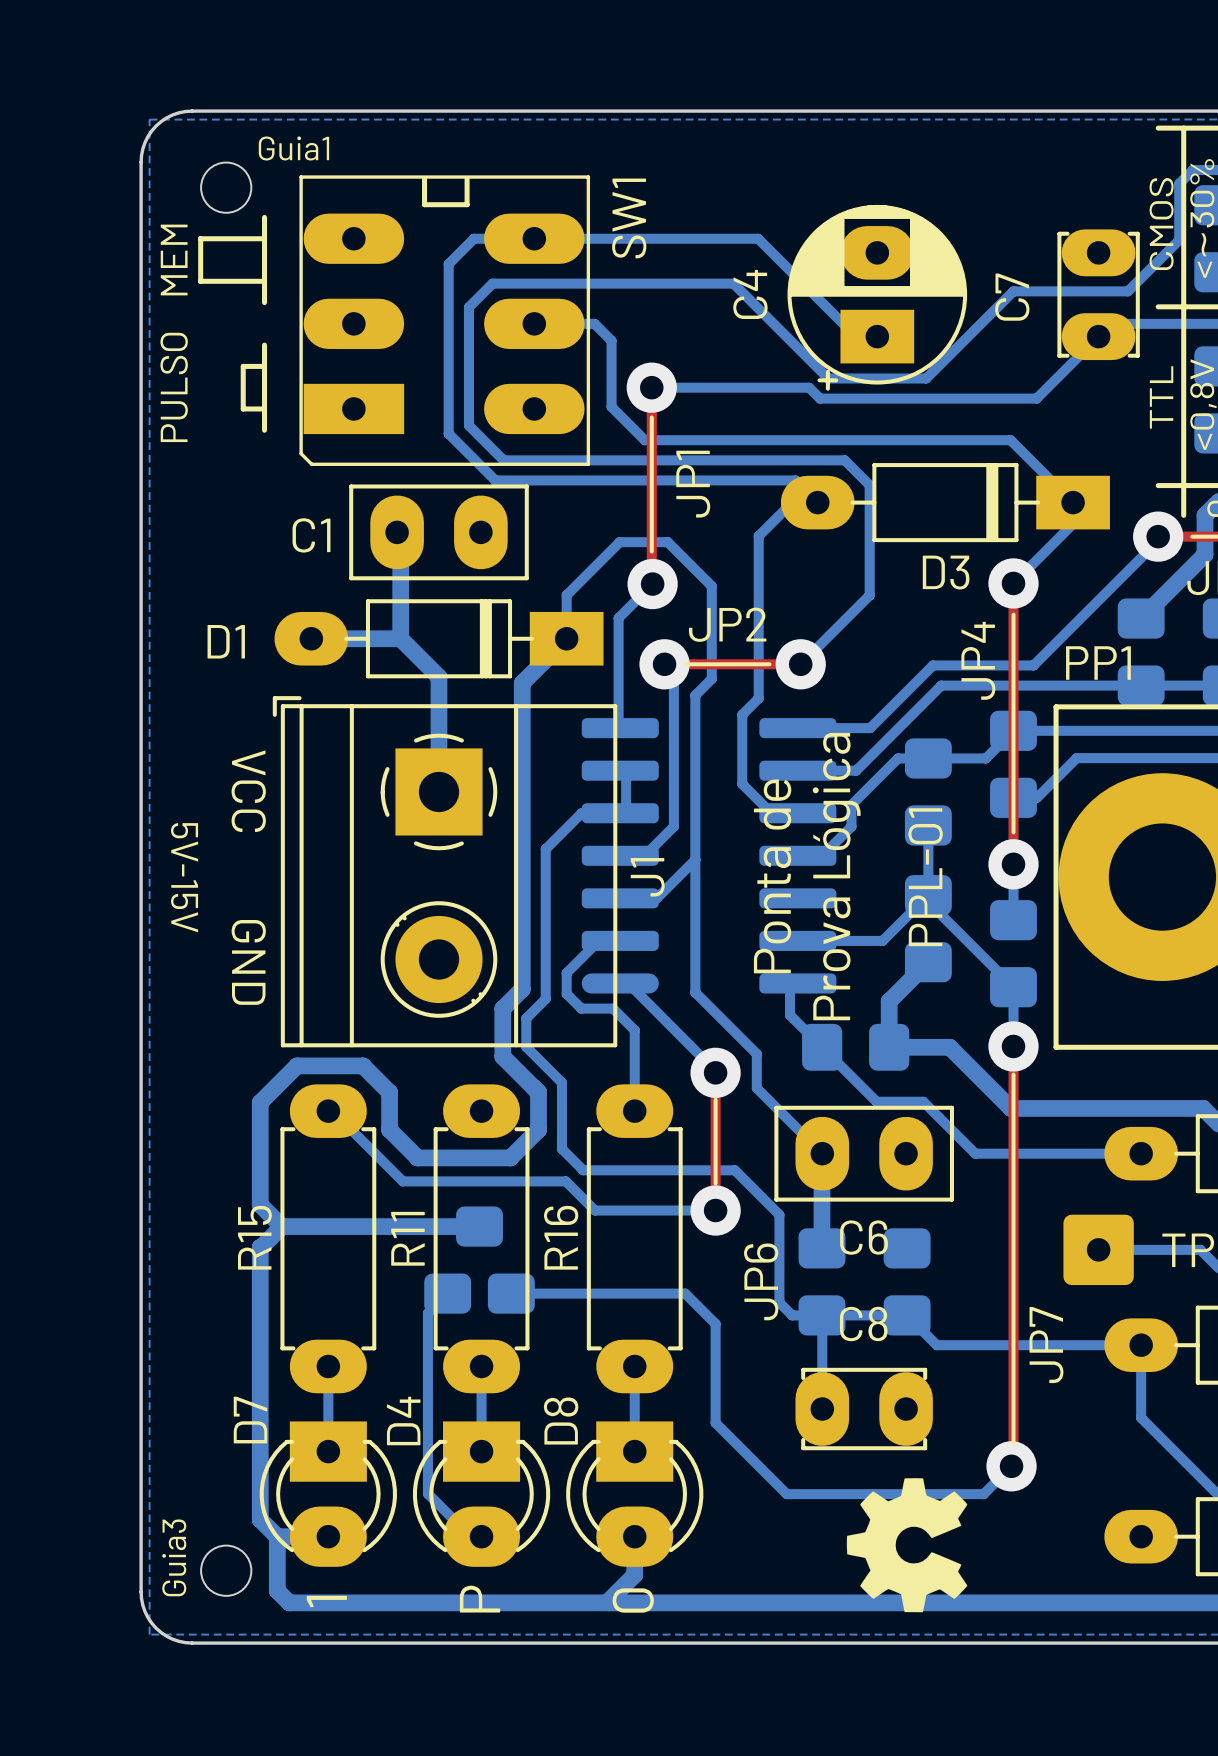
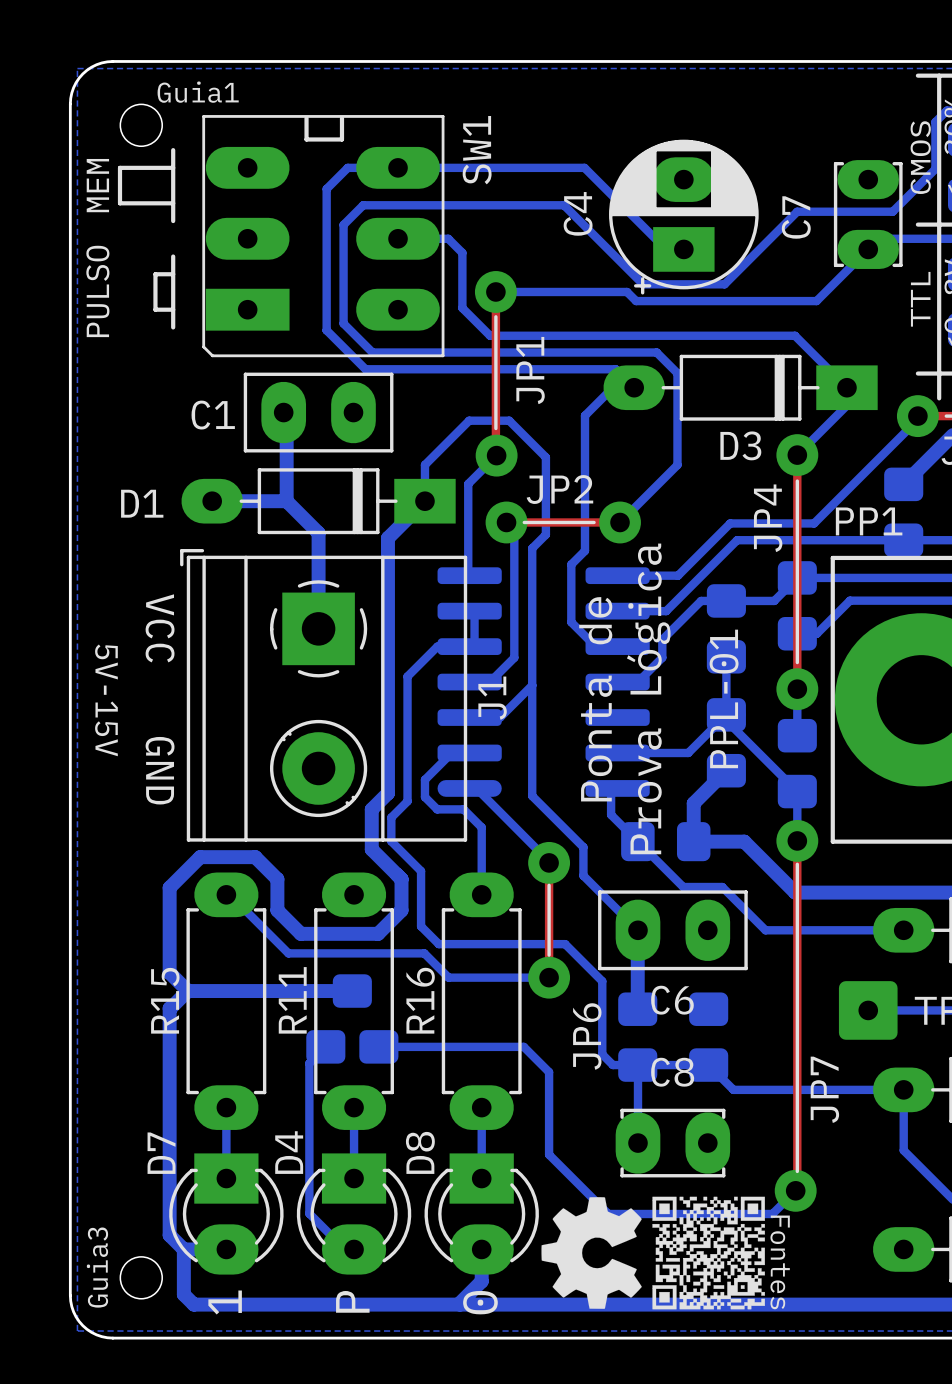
drawing: none -> [652, 1196, 765, 1310]
text: none -> Fontes (780, 1262)
drawing position: (907, 1545) -> (591, 1253)

